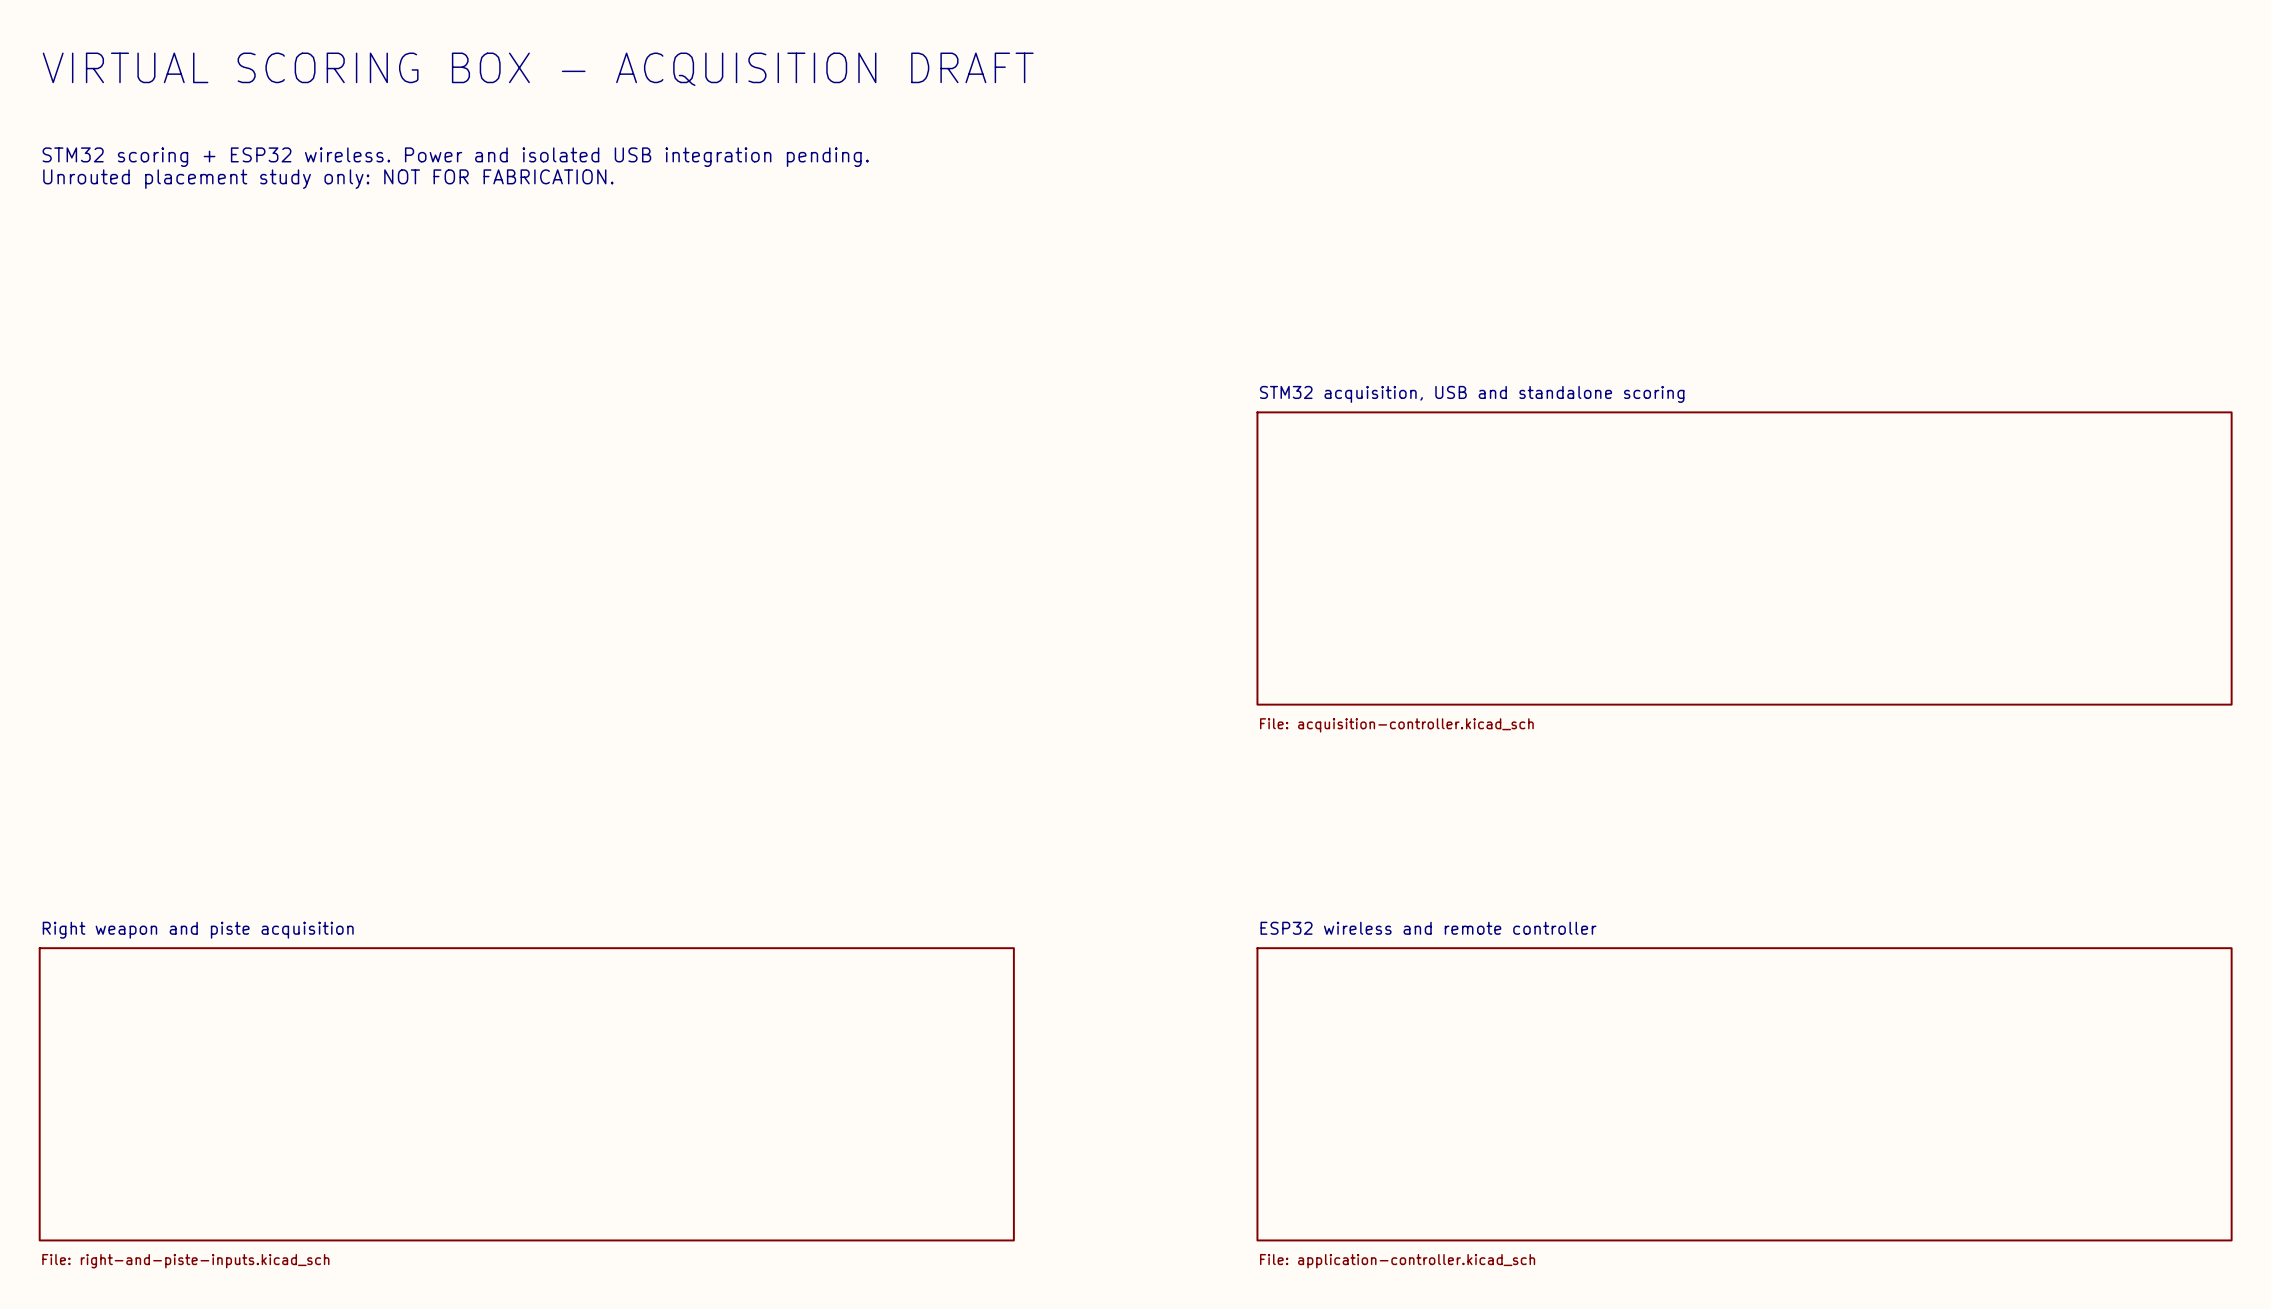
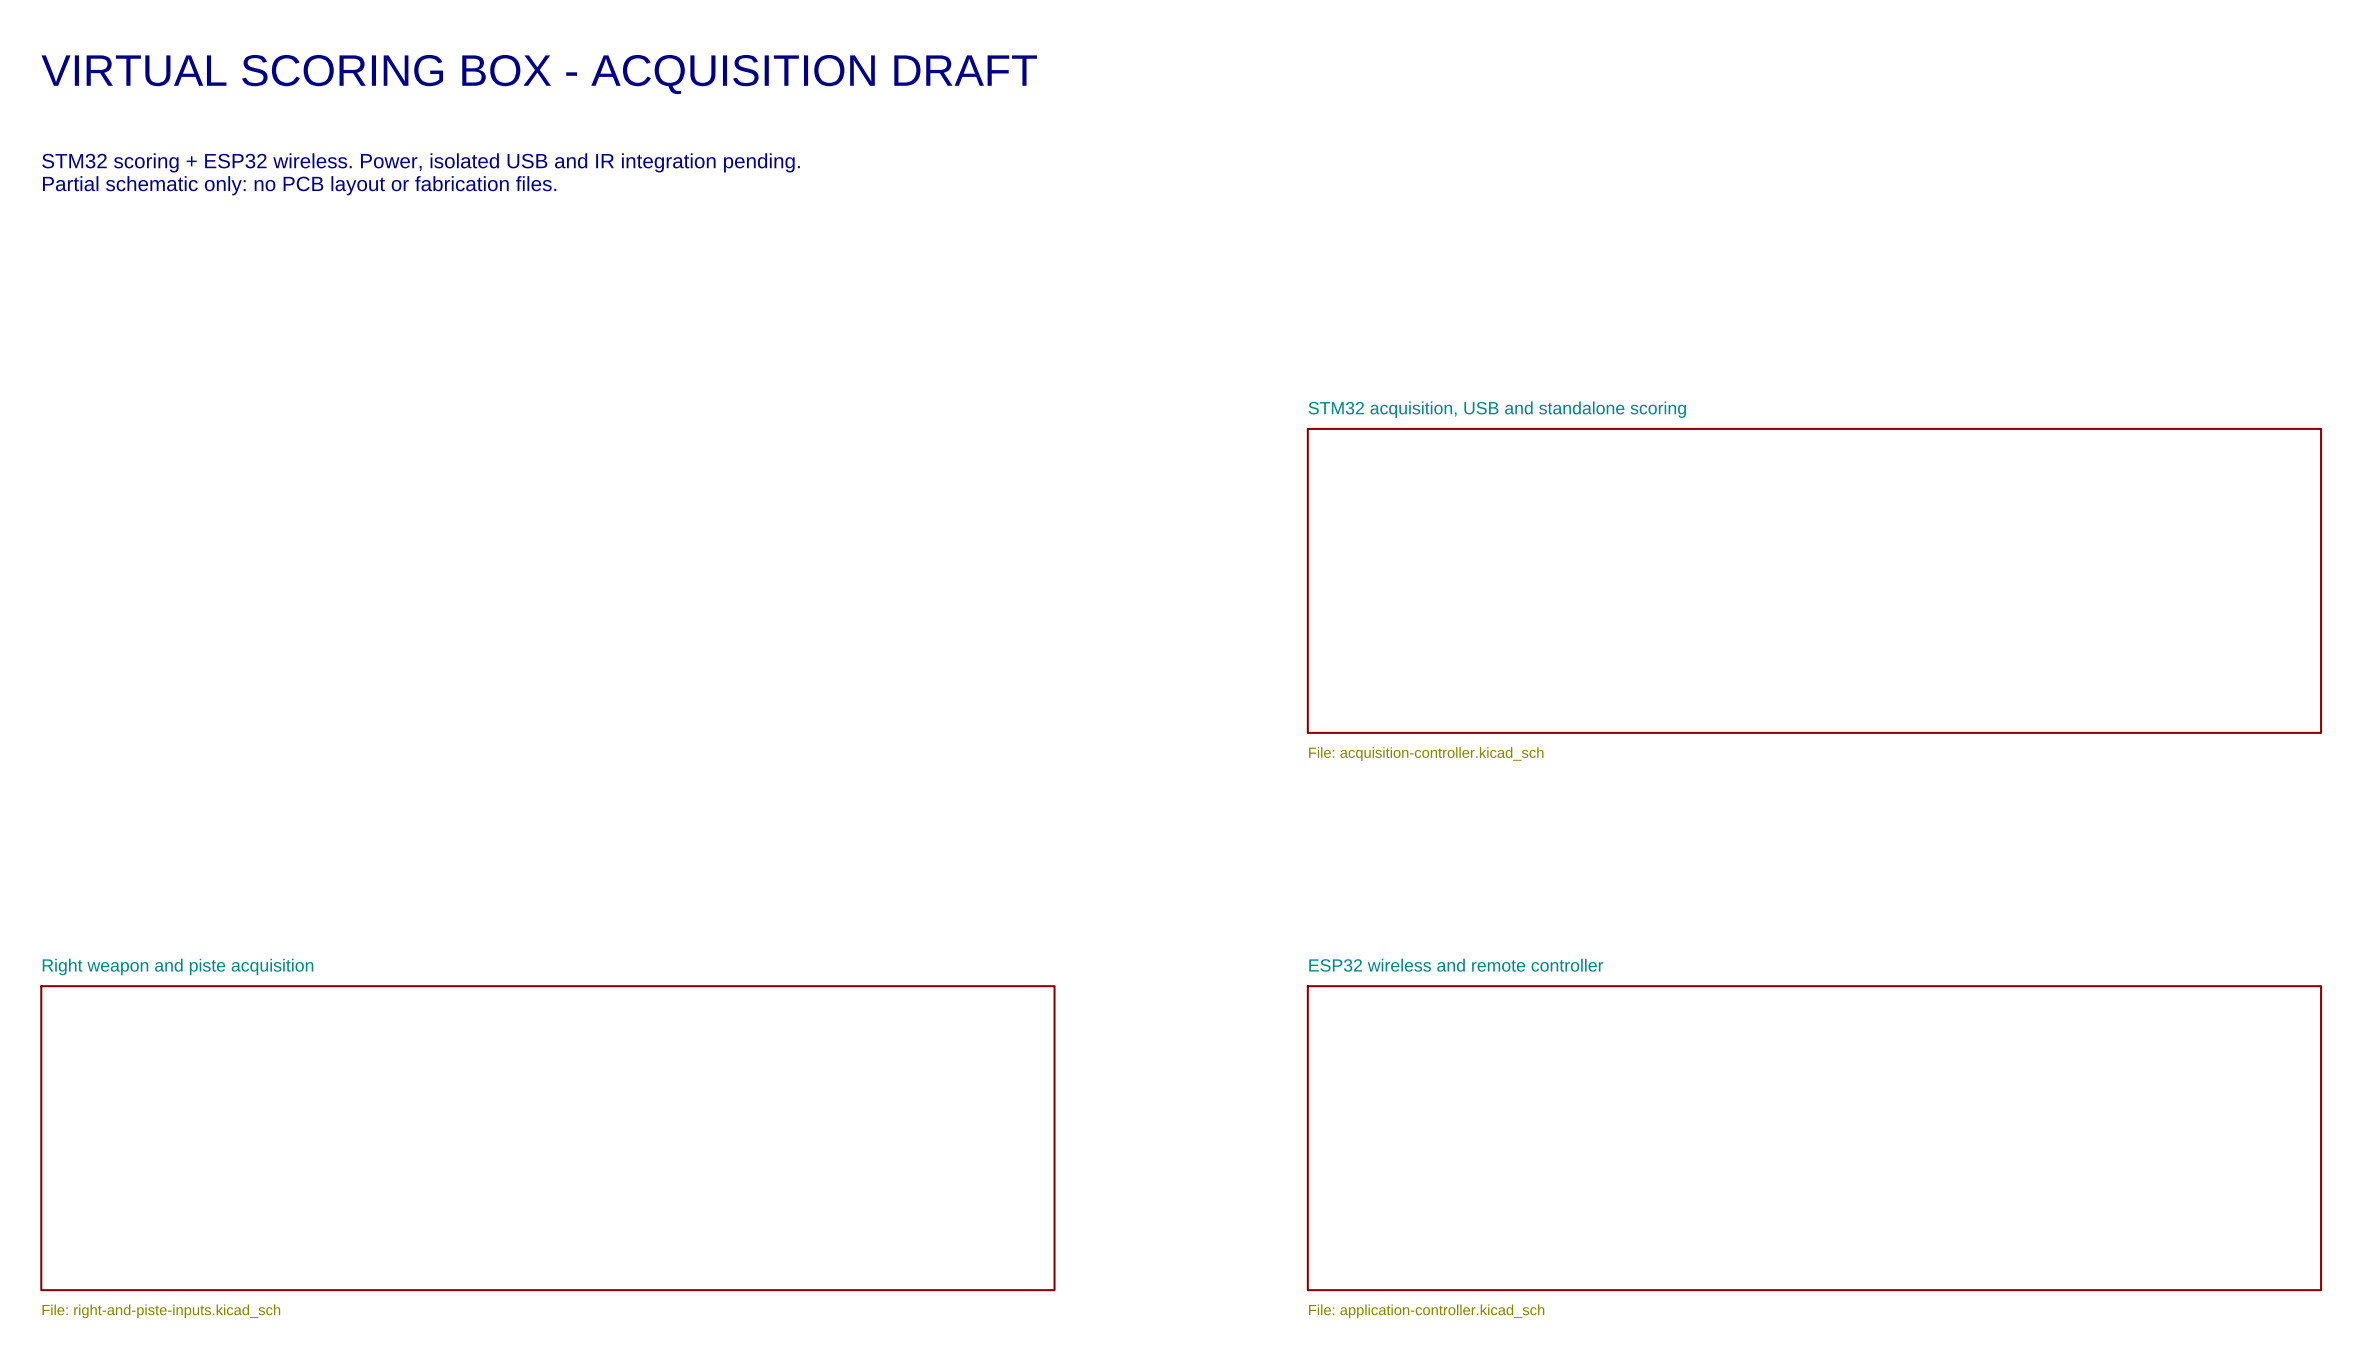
text: STM32 scoring + ESP32 wireless. Power and isolated USB integration pending. (455, 157) -> STM32 scoring + ESP32 wireless. Power, isolated USB and IR integration pending. (421, 162)
text: Unrouted placement study only: NOT FOR FABRICATION. (328, 179) -> Partial schematic only: no PCB layout or fabrication files. (299, 185)

